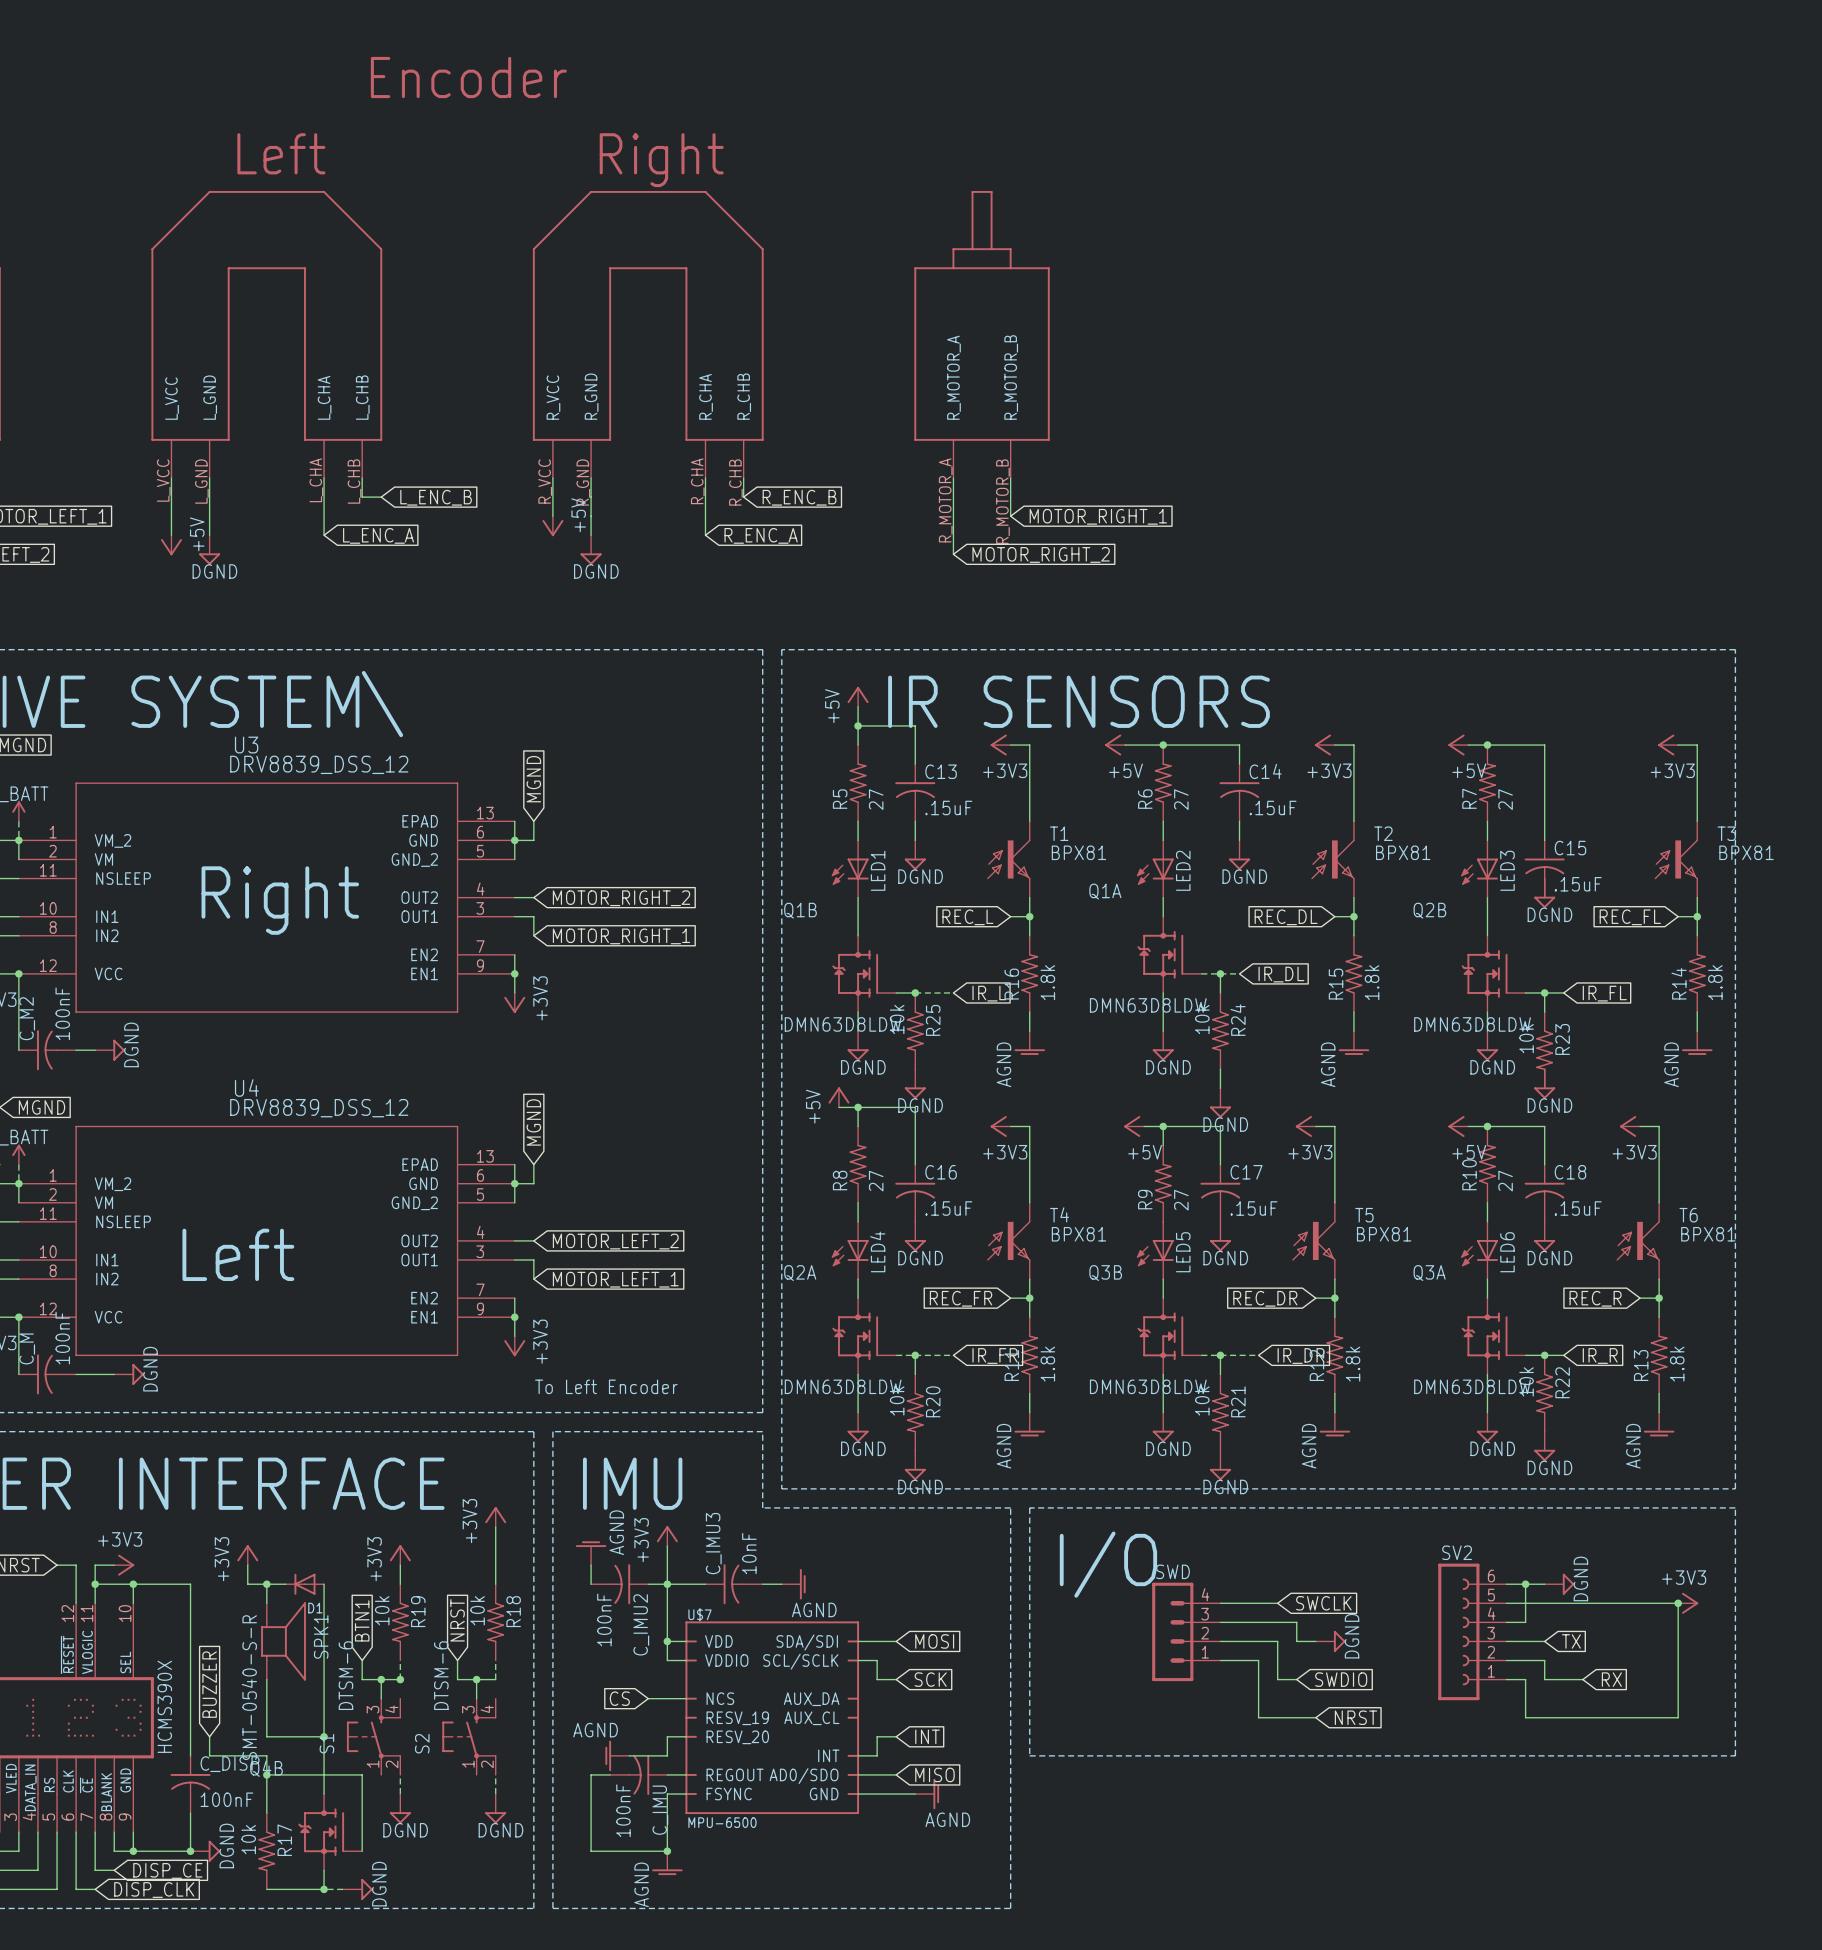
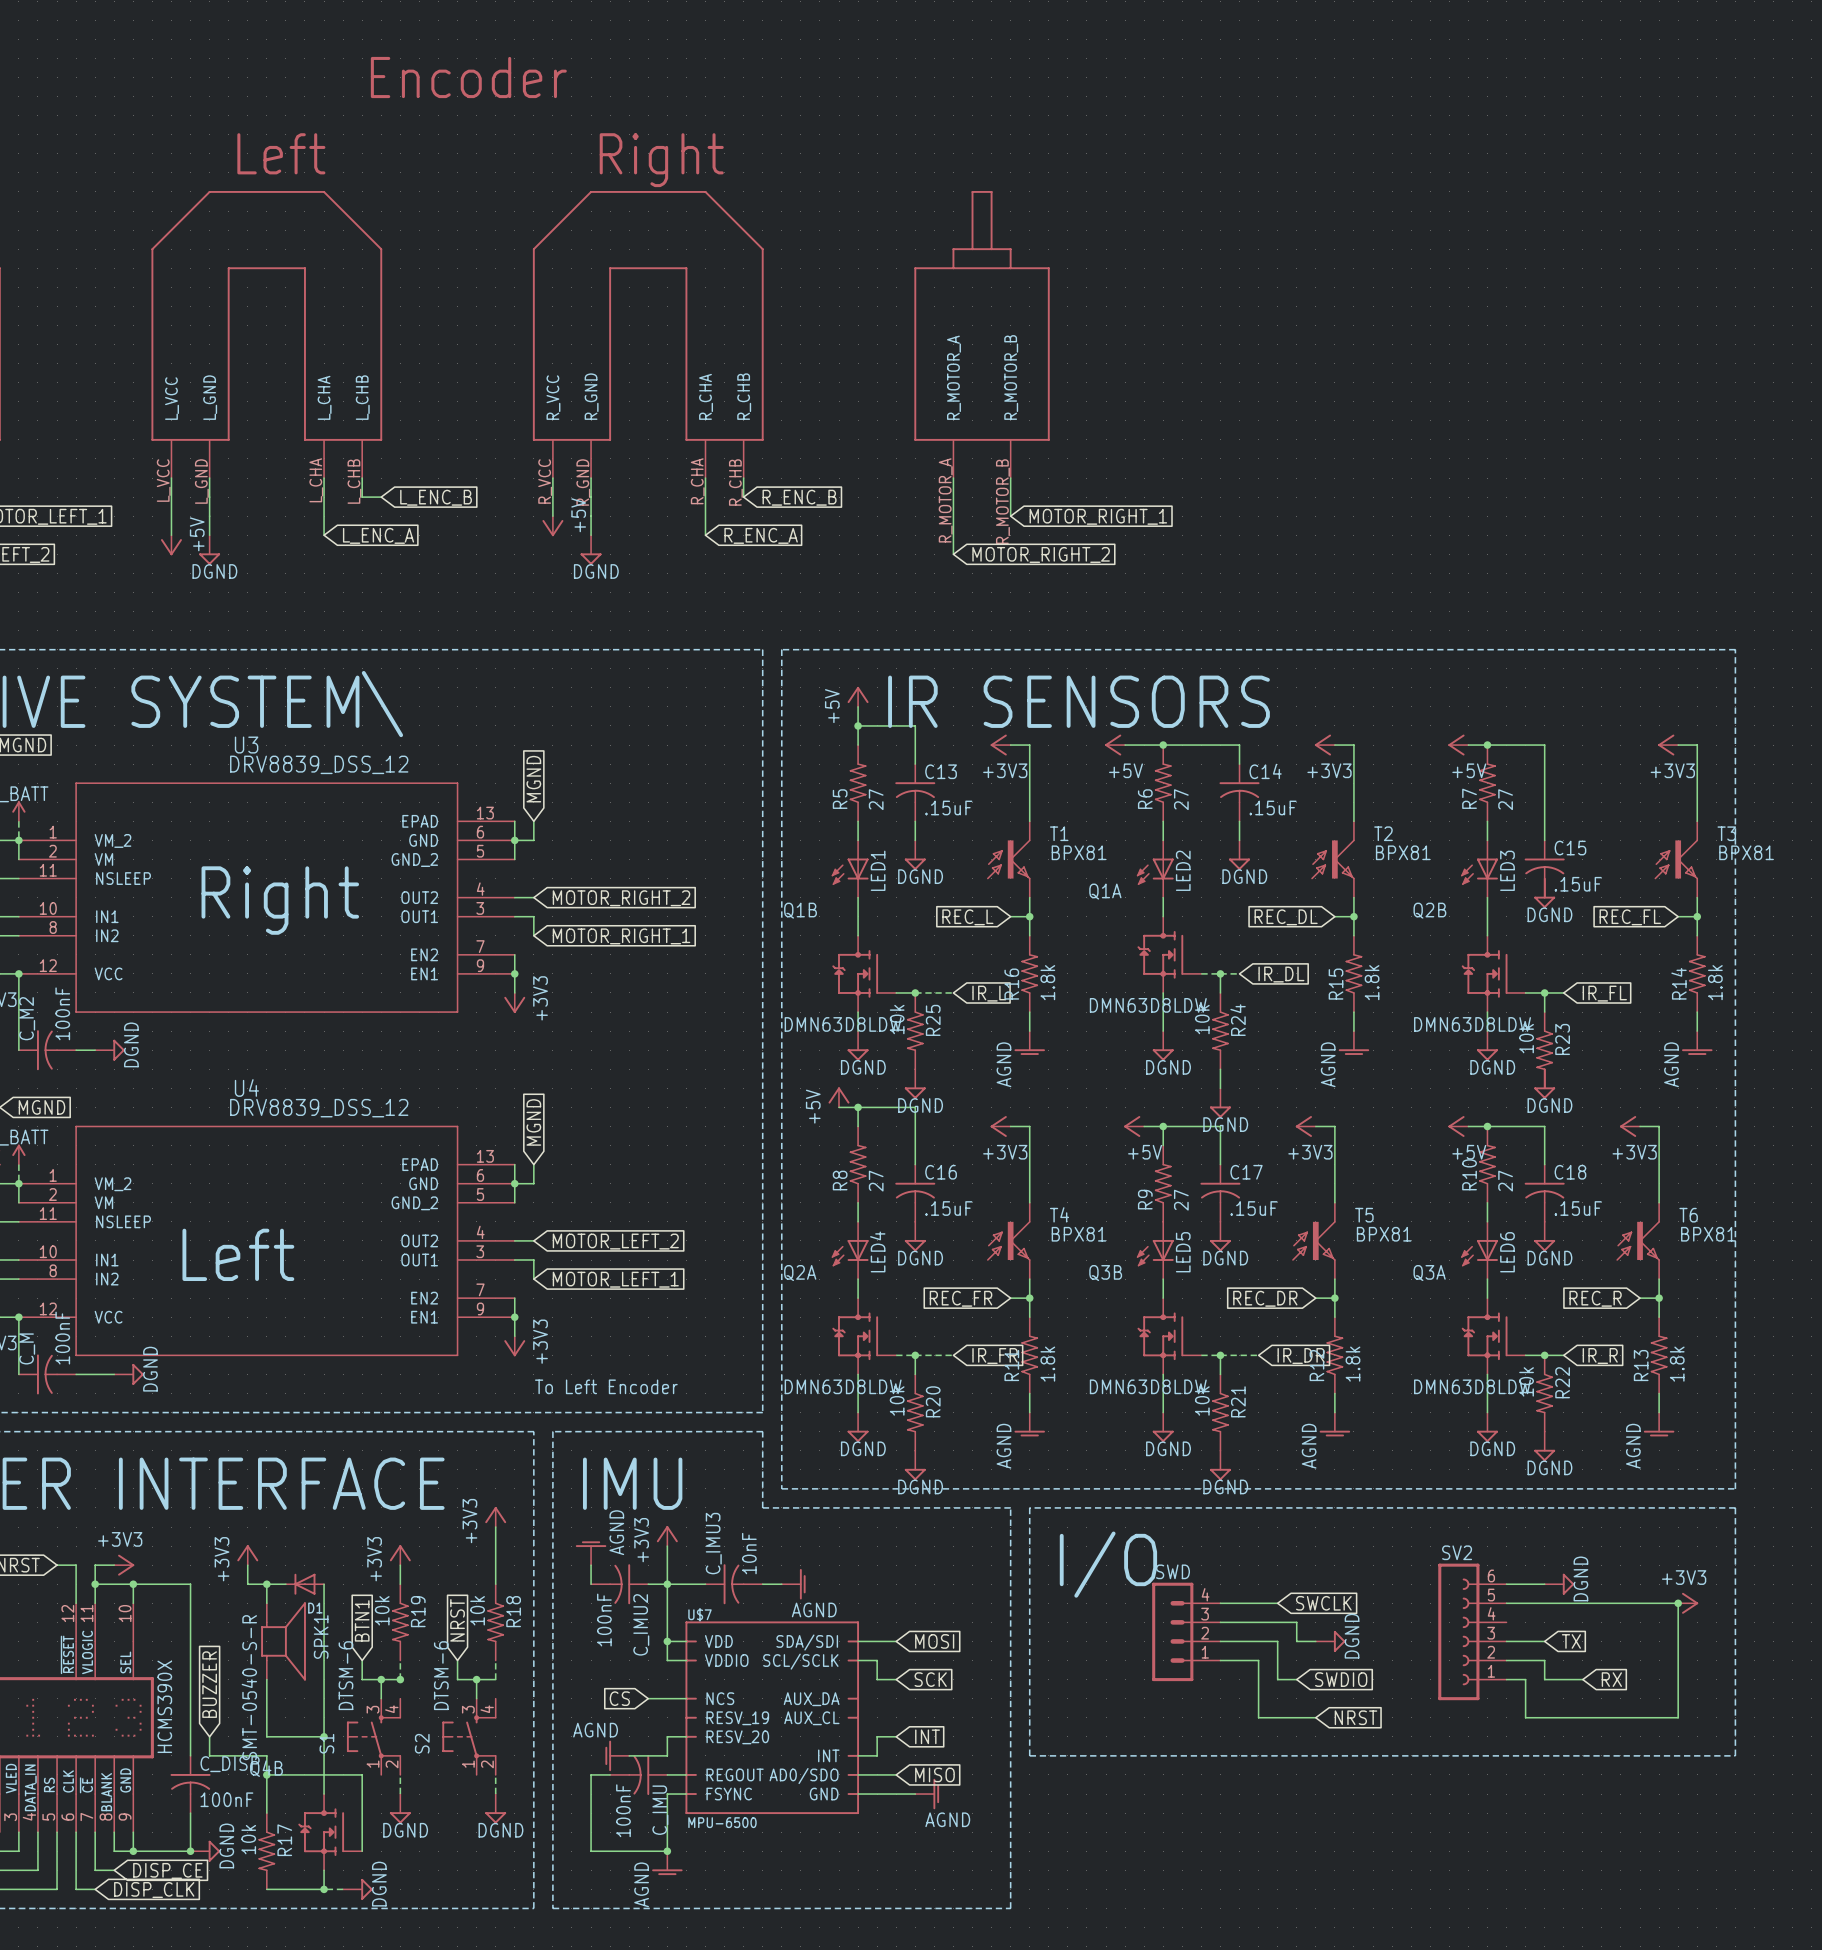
wire: (1525, 1584) (1525, 1622) (1506, 1622) -> none
junction: (1525, 1584) -> none

